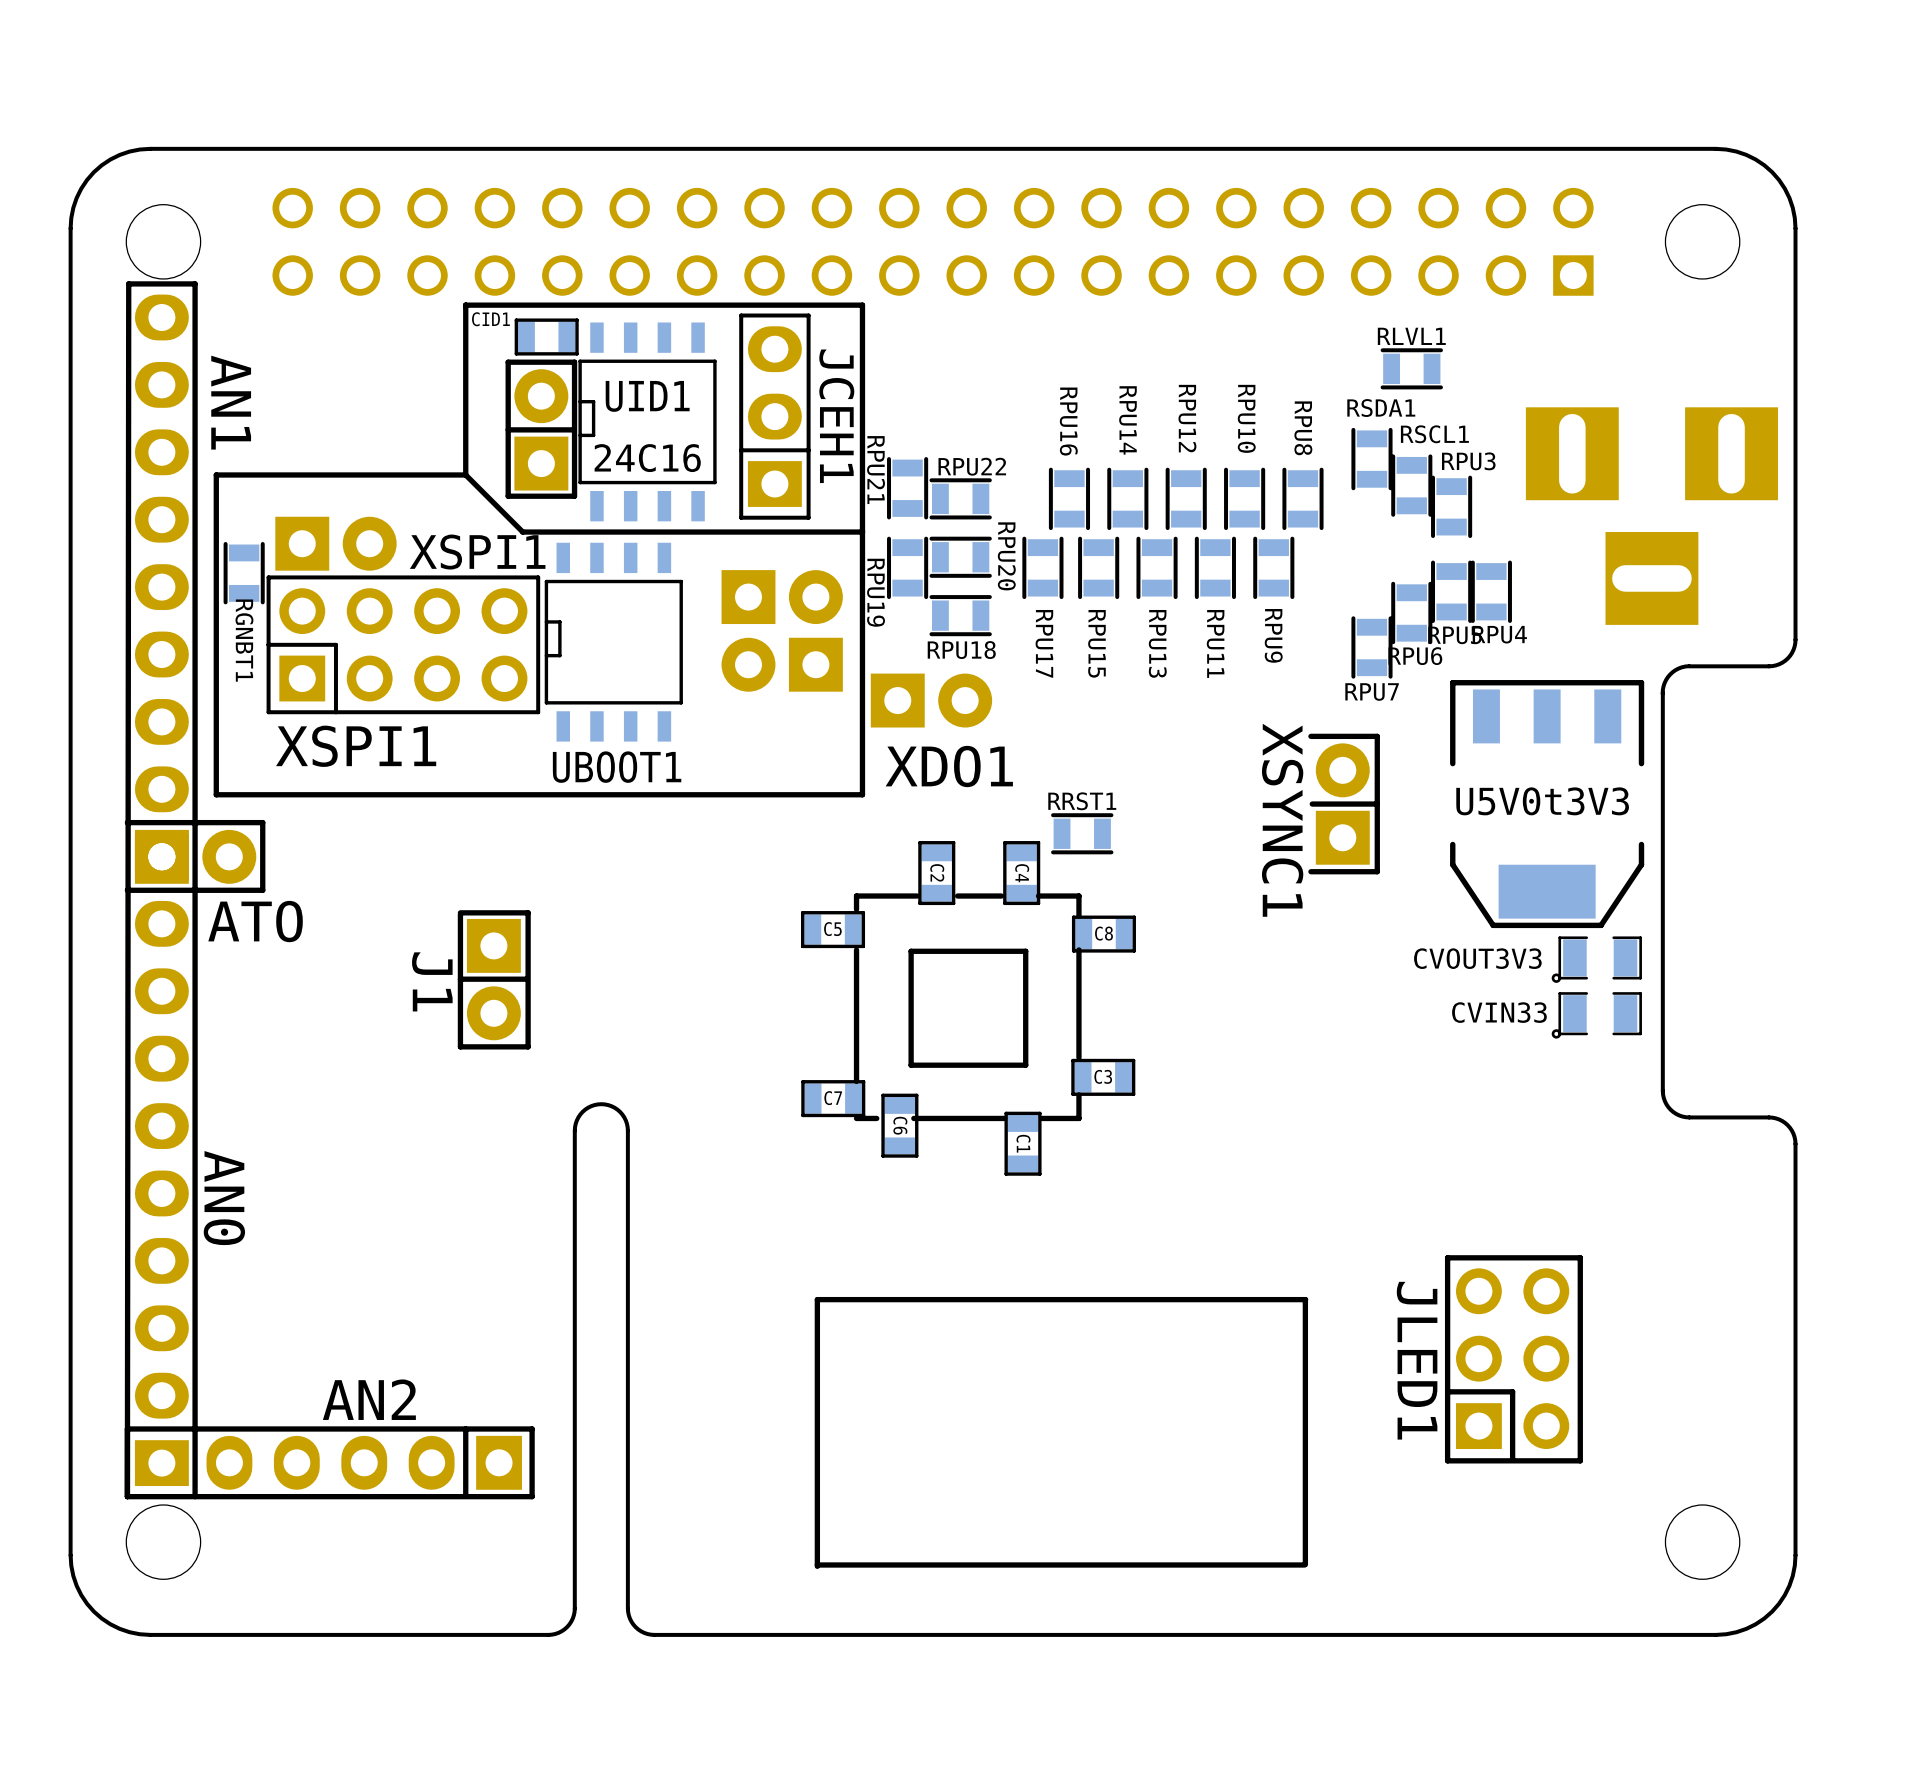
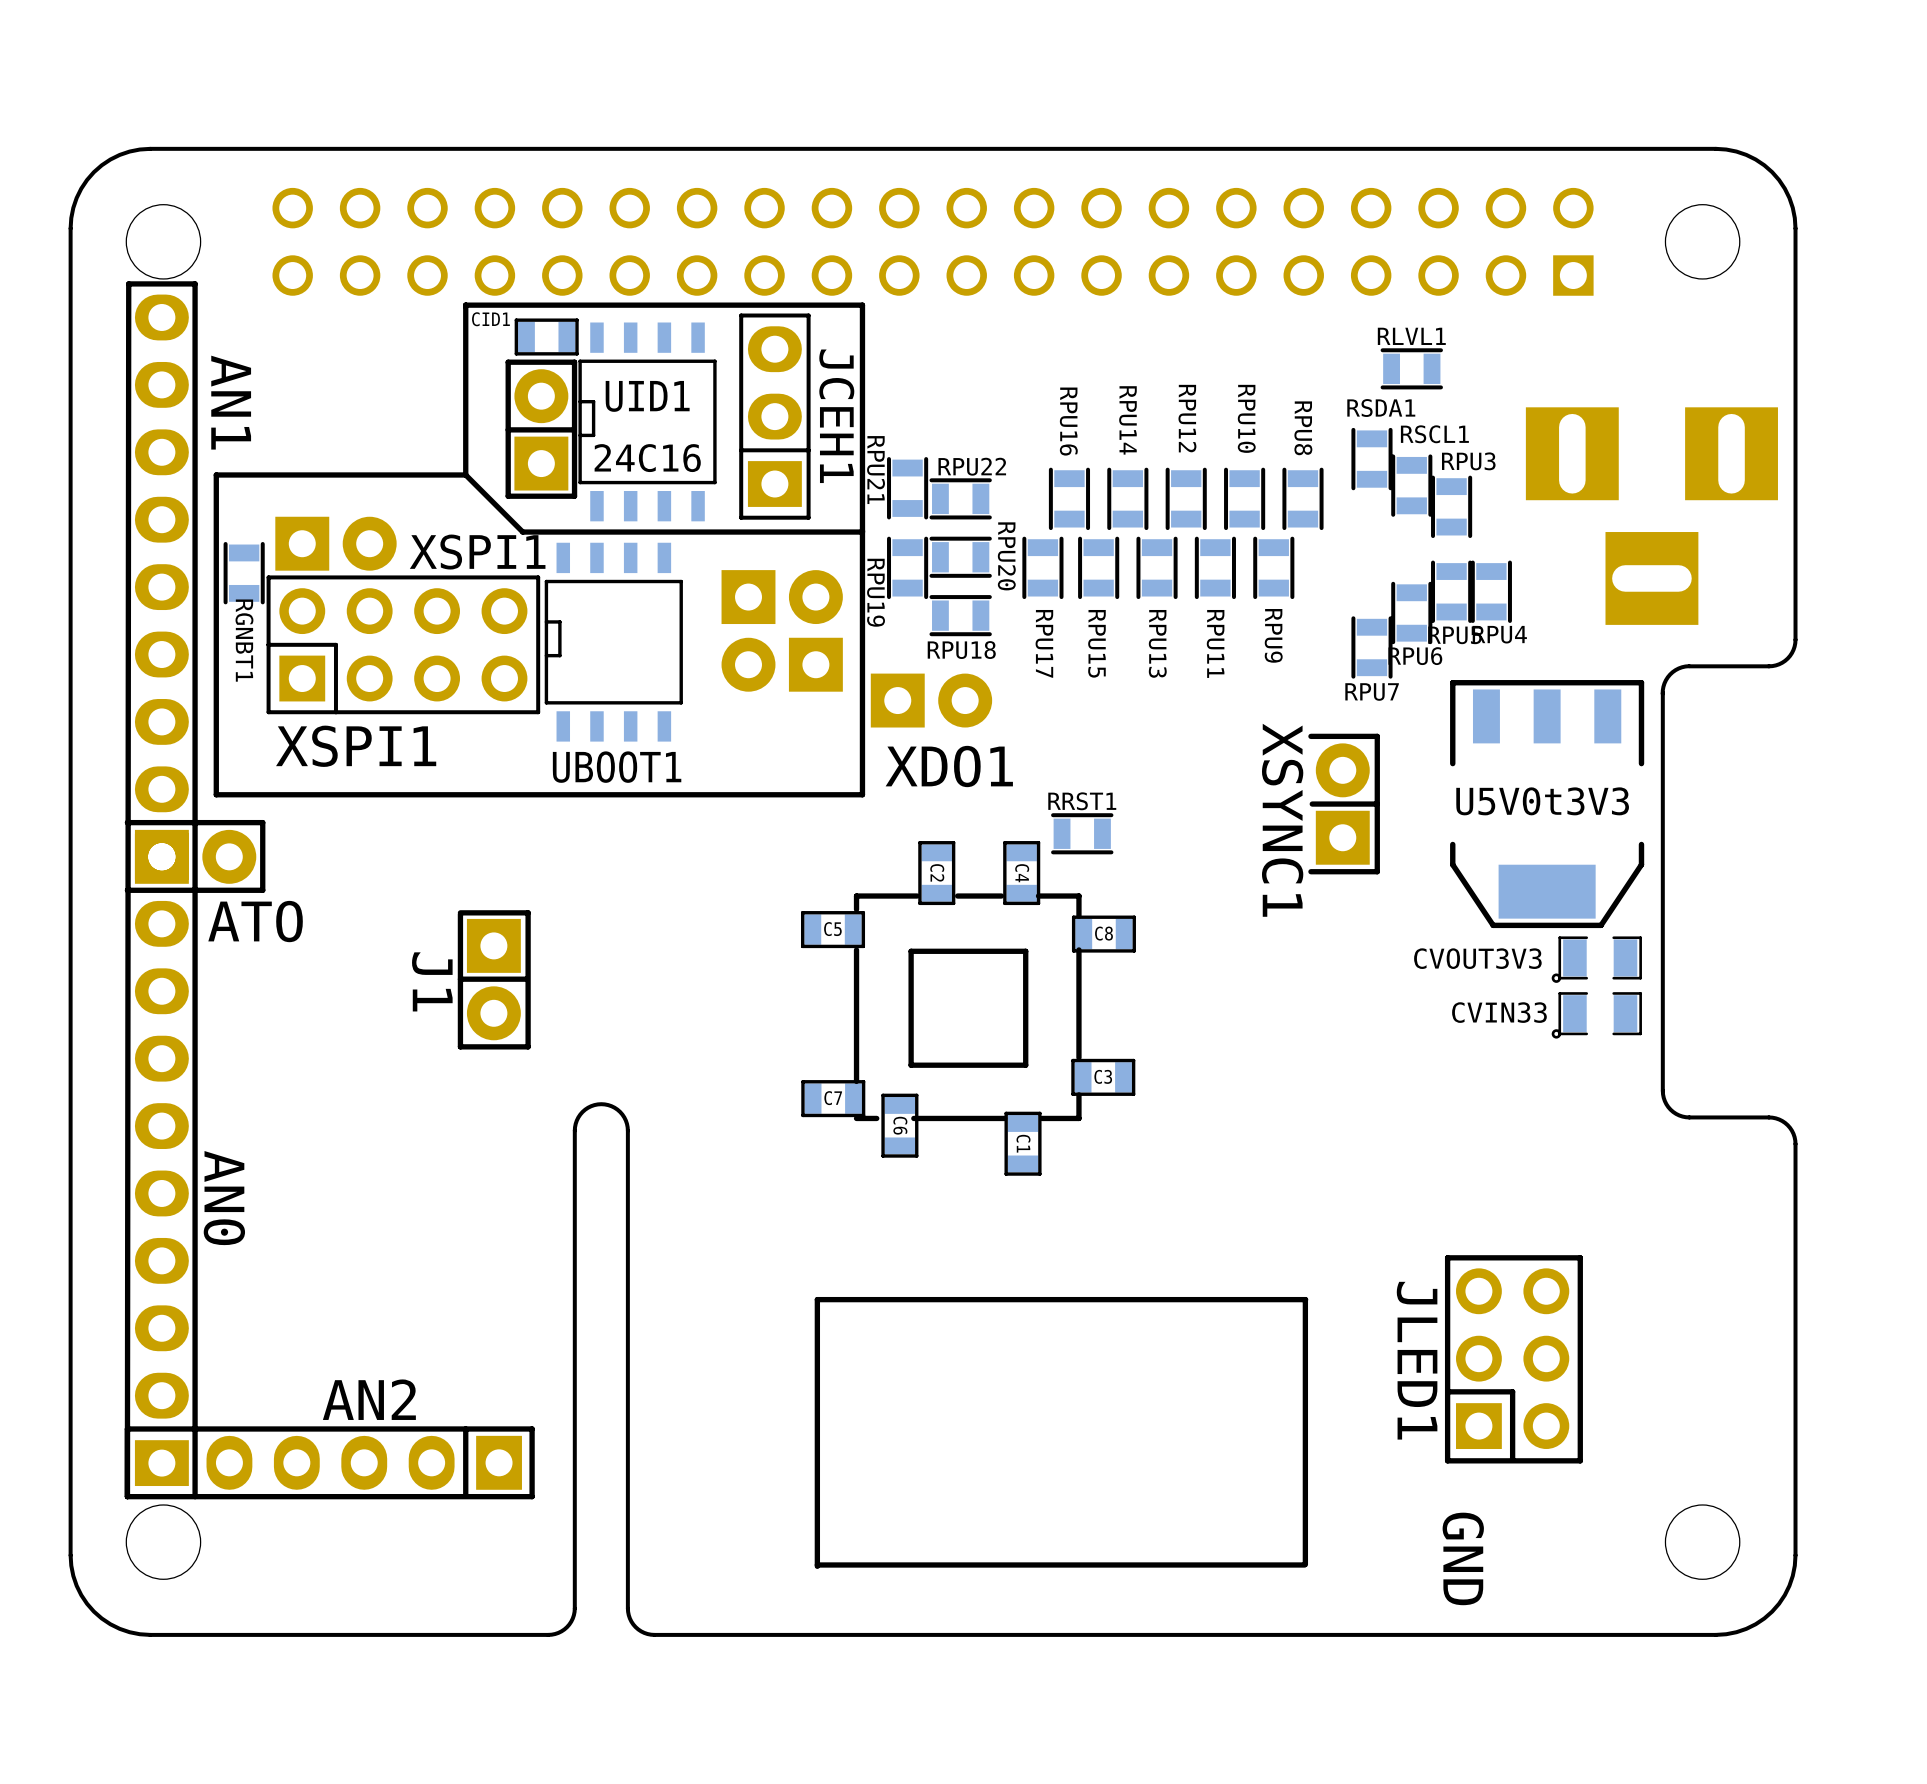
text: none -> GND (1463, 1558)

